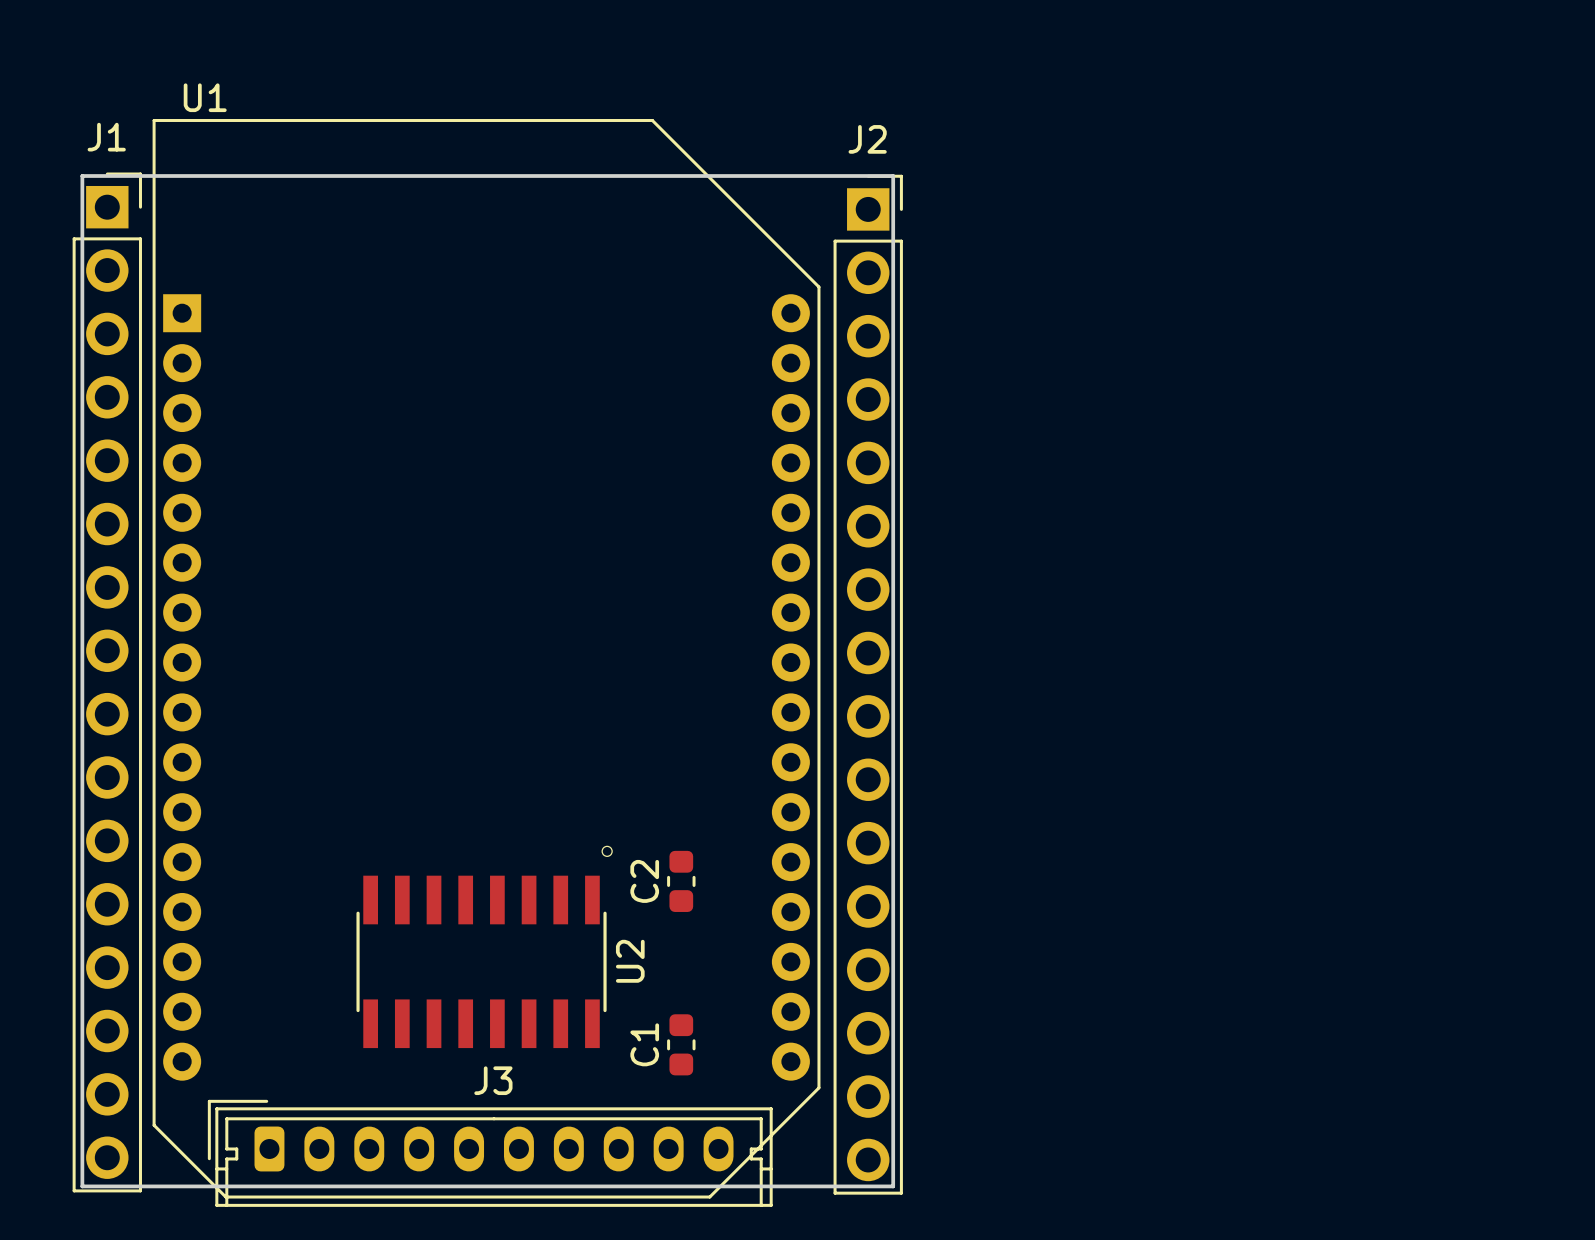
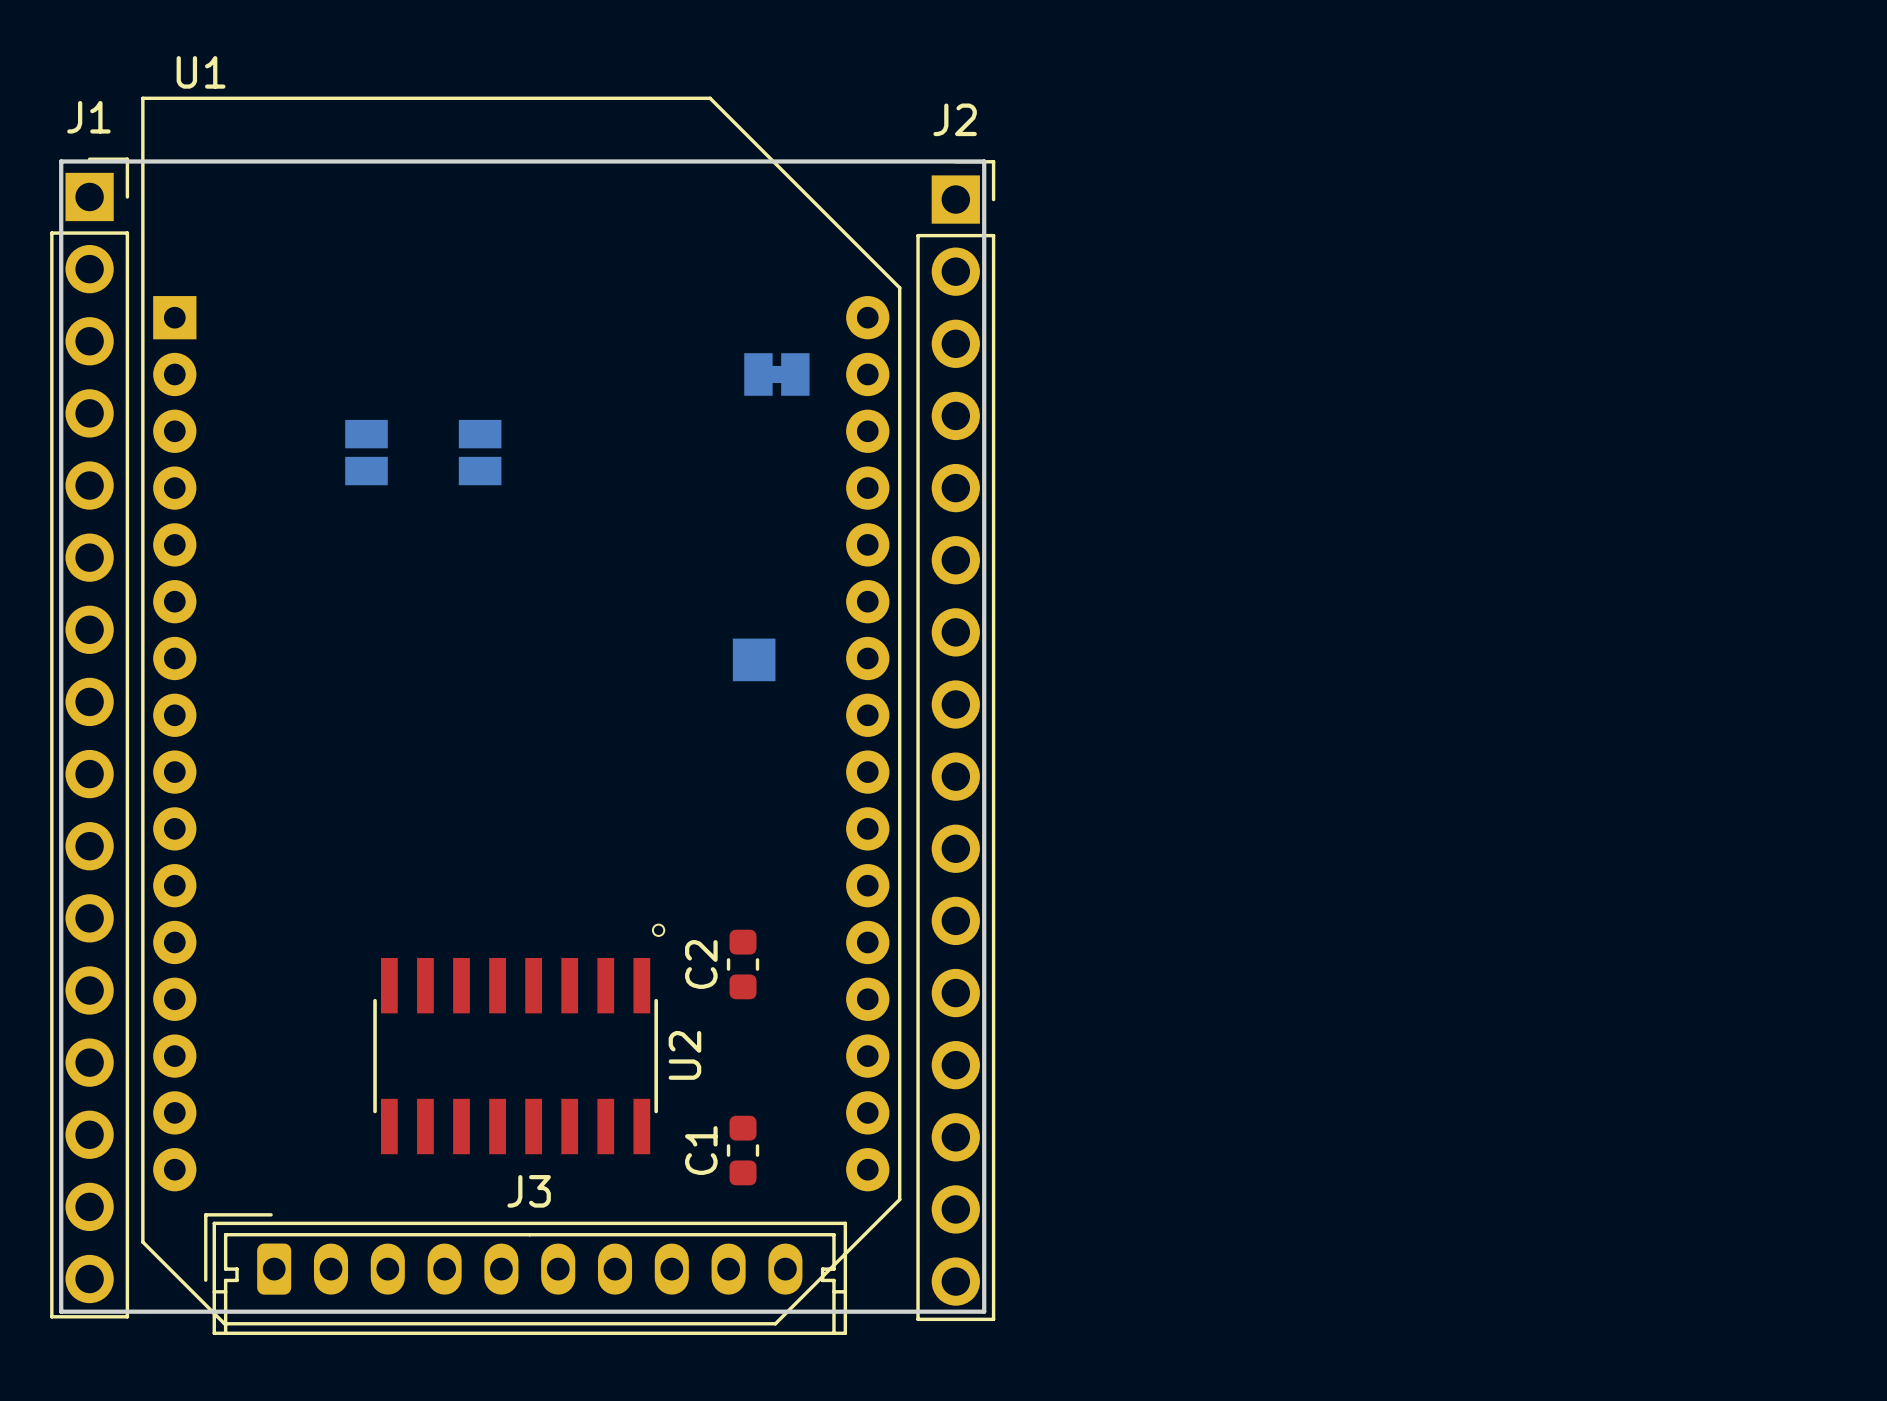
part: none -> (776, 374)
part: none -> (366, 452)
part: none -> (480, 452)
part: none -> (754, 659)

